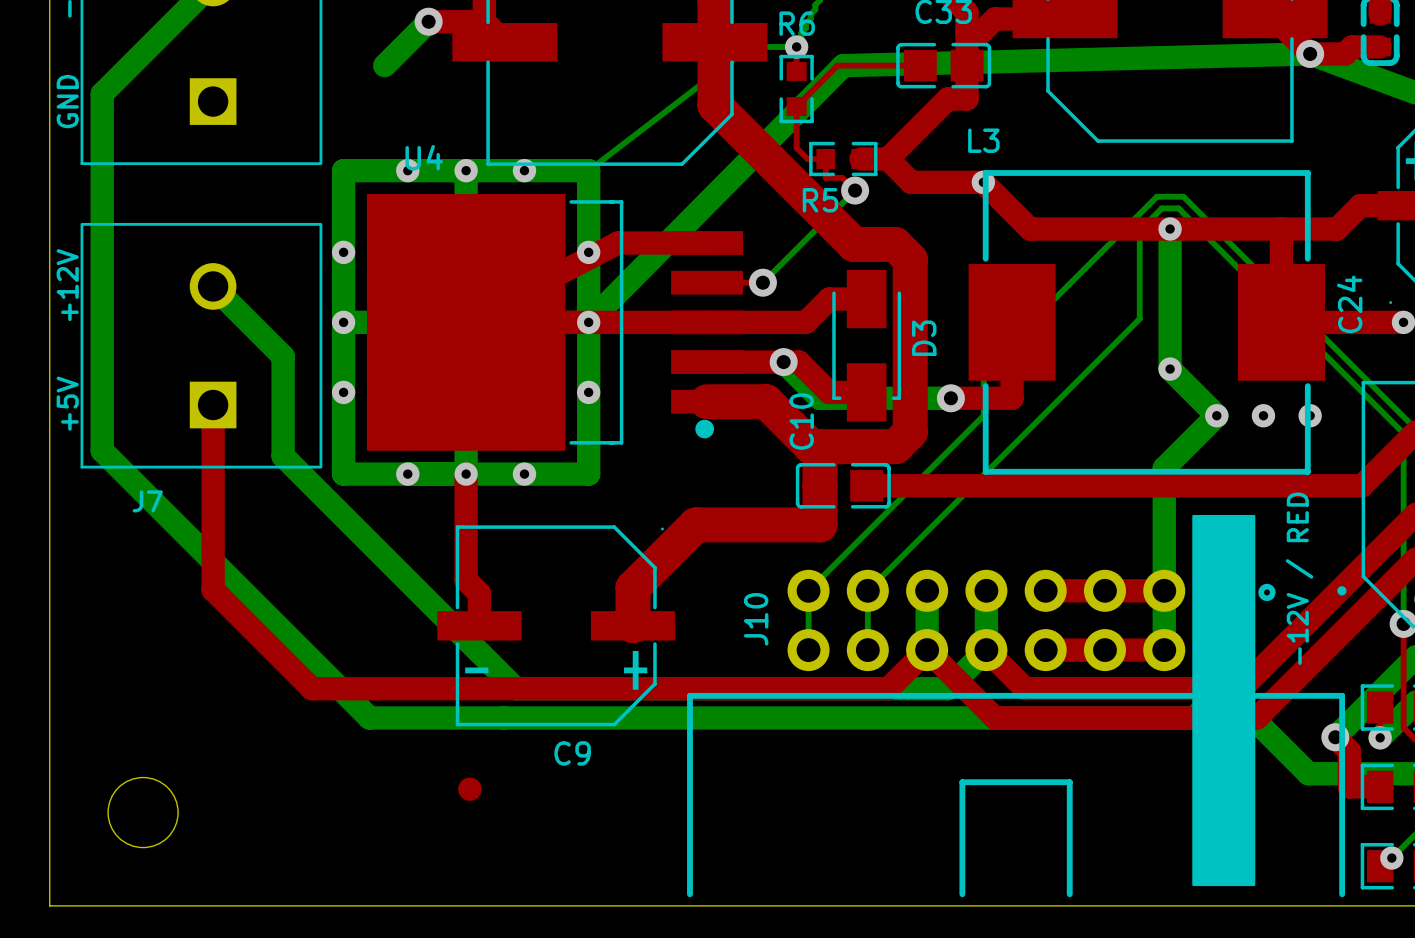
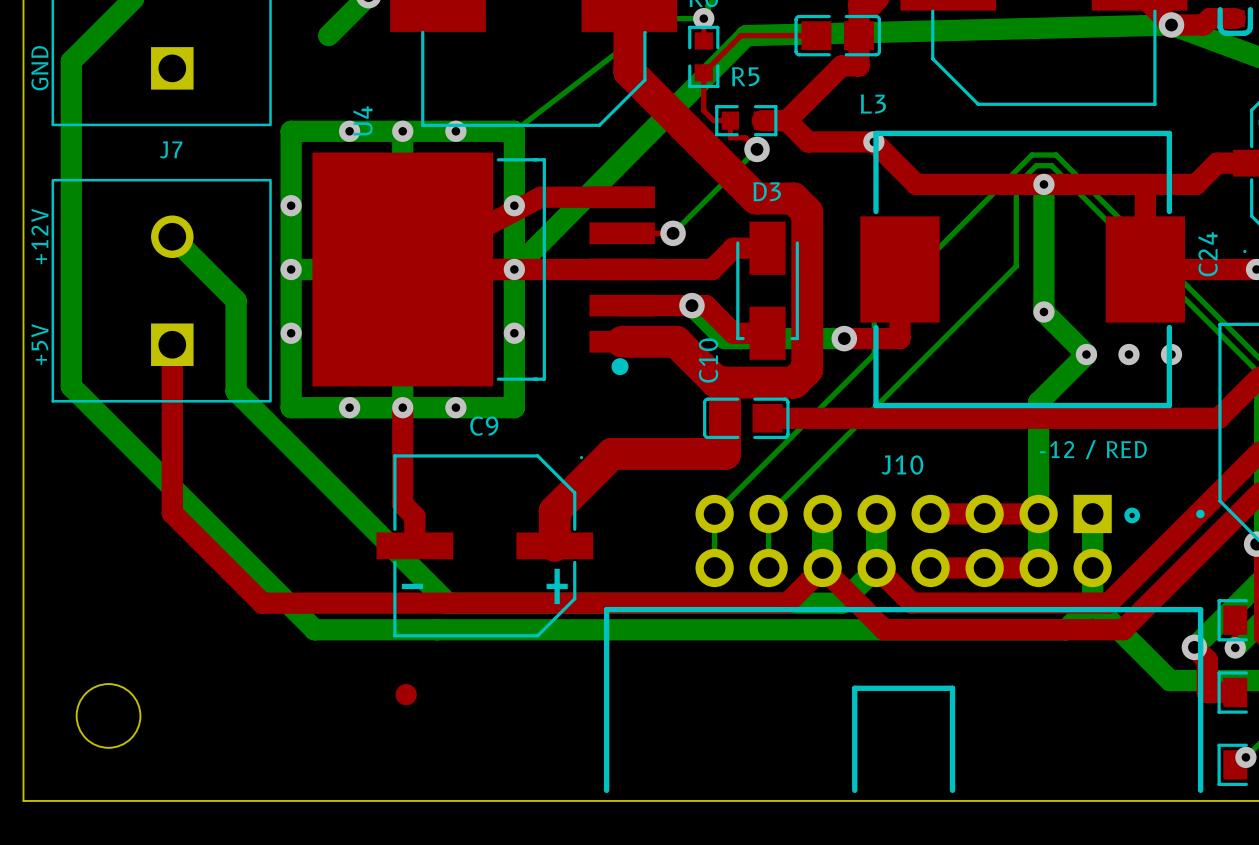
U4 name rotation: 0° (424, 157) -> 90° counterclockwise (363, 120)
R5 name position: R5 (820, 200) -> R5 (745, 76)
D3 name rotation: 0° (924, 338) -> 90° clockwise (767, 191)
D3 name position: D3 (924, 338) -> D3 (767, 191)
J7 name position: J7 (147, 501) -> J7 (171, 149)
drawing: [1192, 514, 1256, 887] -> none
text: -12V / RED (1299, 578) -> -12 / RED (1093, 449)
J10 name rotation: 0° (756, 619) -> 90° clockwise (902, 464)
J10 name position: J10 (756, 619) -> J10 (902, 464)
C9 name position: C9 (572, 753) -> C9 (484, 426)

